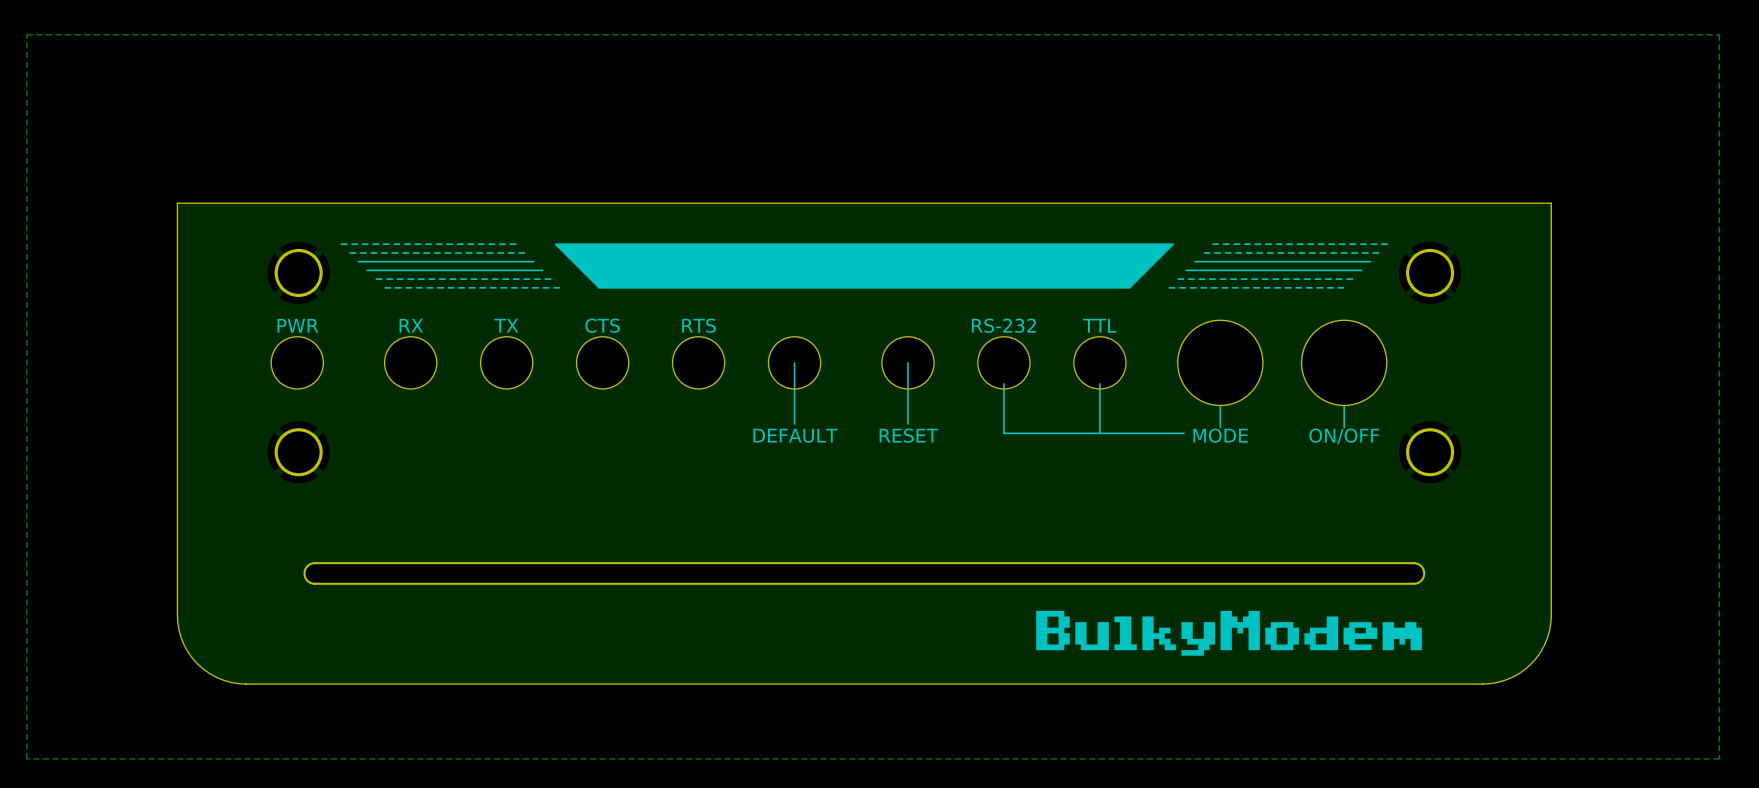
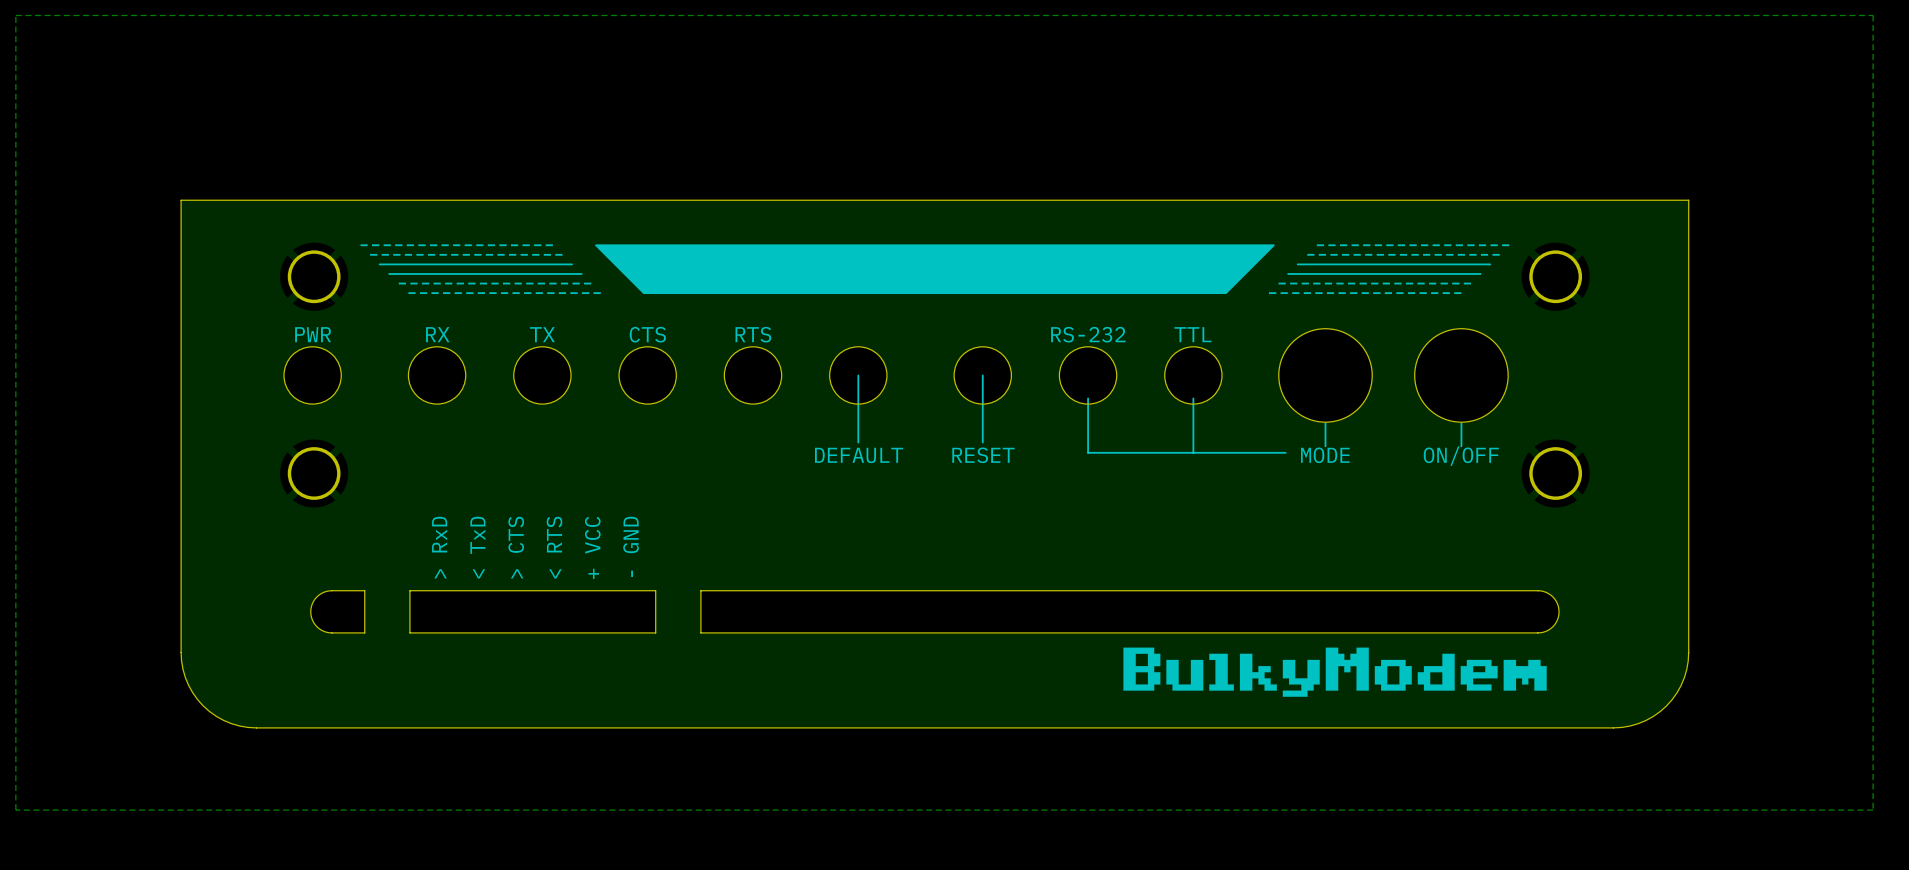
text: none -> > RxD (439, 547)
text: none -> + VCC (592, 547)
text: none -> < TxD (477, 547)
text: none -> > CTS (516, 547)
text: none -> < RTS (554, 547)
text: none -> - GND (631, 546)
board edge: none -> (331, 590) (364, 590) (364, 632) (329, 632) (321, 630) (315, 624) (310, 614) (312, 603) (319, 595) (331, 590)
board edge: none -> (409, 590) (655, 590) (655, 632) (409, 632) (409, 590)
board edge: none -> (700, 590) (1537, 590) (1551, 596) (1557, 604) (1559, 611) (1557, 619) (1551, 627) (1537, 632) (700, 632) (700, 590)
board edge: (314, 563) (1413, 563) (1421, 566) (1424, 573) (1421, 580) (1413, 583) (314, 583) (307, 581) (304, 573) (307, 565) (314, 563) -> none

